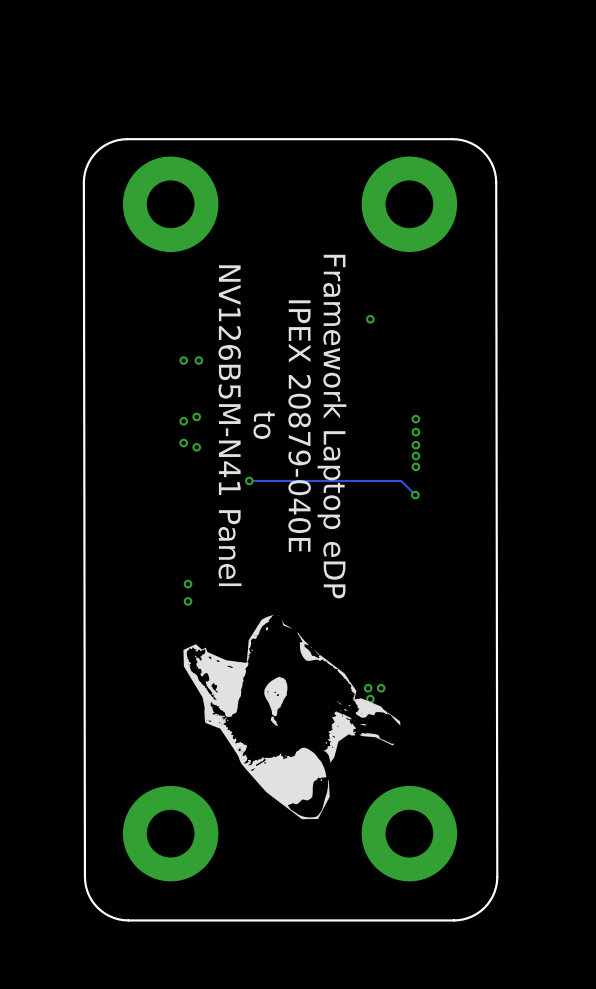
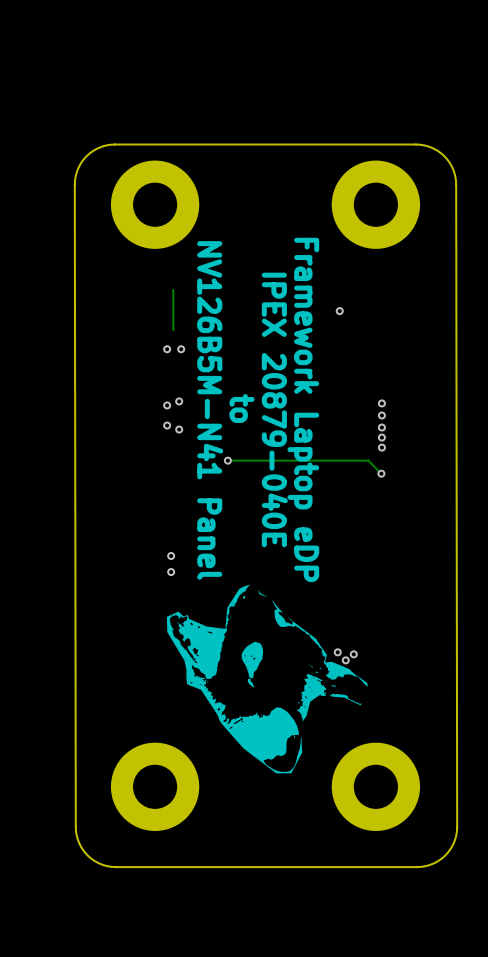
track: none -> (173, 290) (173, 330)
via: (381, 688) -> none
via: none -> (353, 654)
via: none -> (345, 660)
via: (370, 699) -> none

